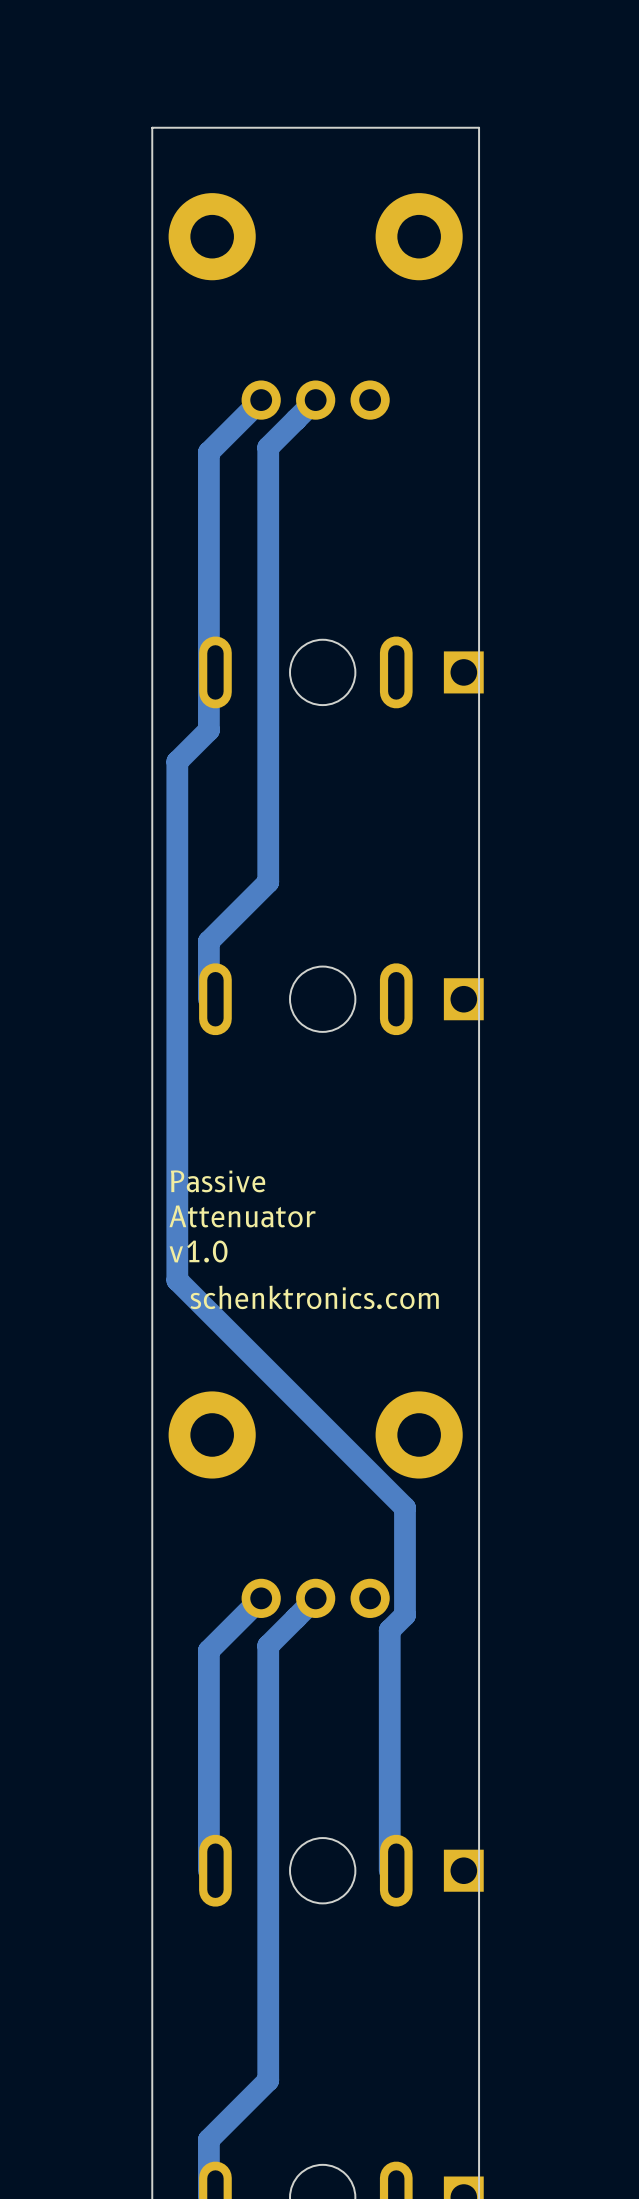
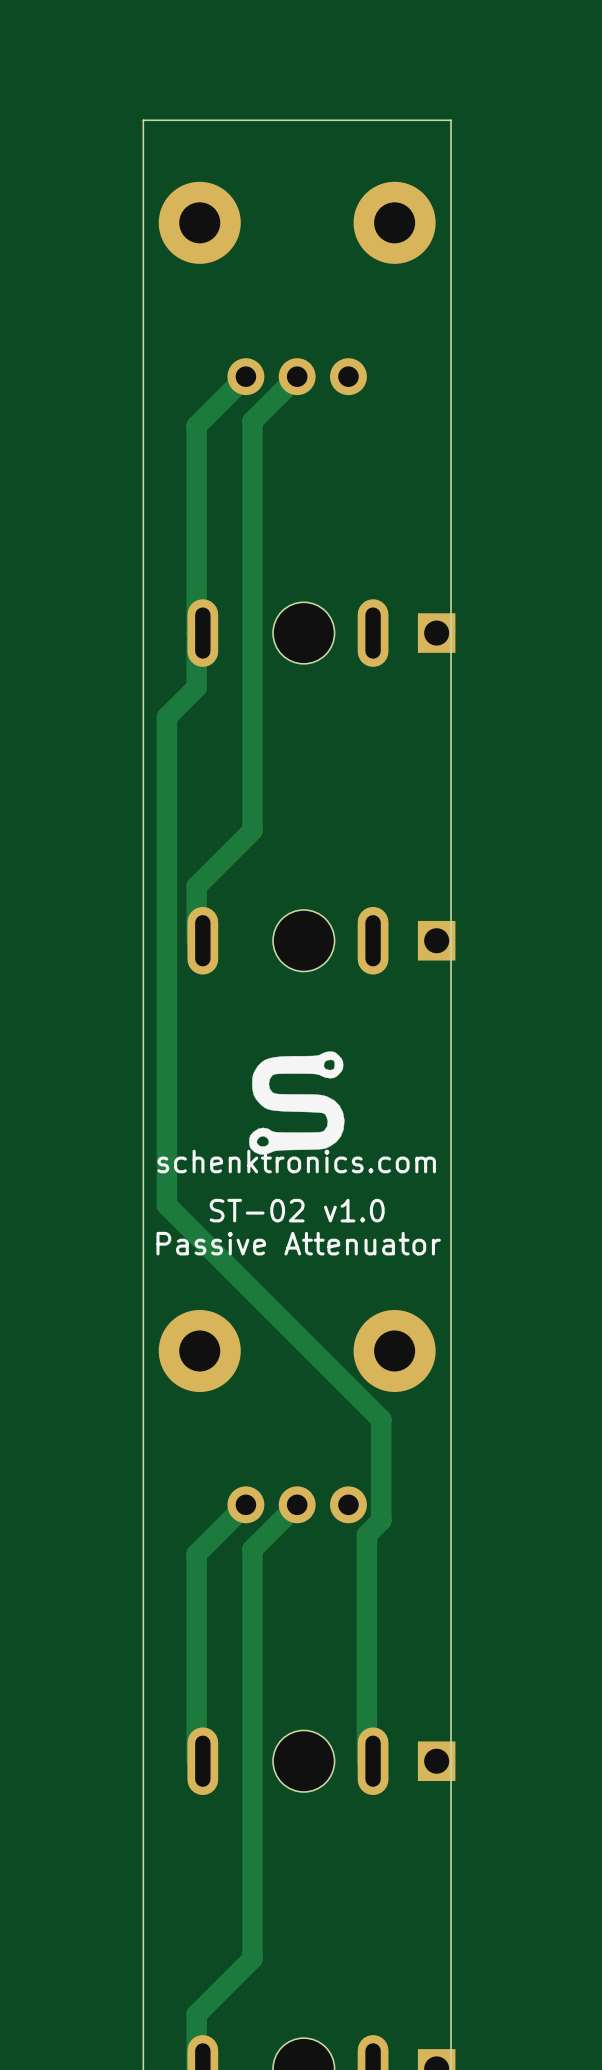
drawing: none -> [249, 1051, 345, 1155]
text: Passive (218, 1181) -> none
text: Attenuator (242, 1216) -> none
text: v1.0 (198, 1251) -> none
text: none -> ST-02 v1.0 (297, 1210)
text position: schenktronics.com (314, 1297) -> schenktronics.com (296, 1161)
text: none -> Passive Attenuator (298, 1243)

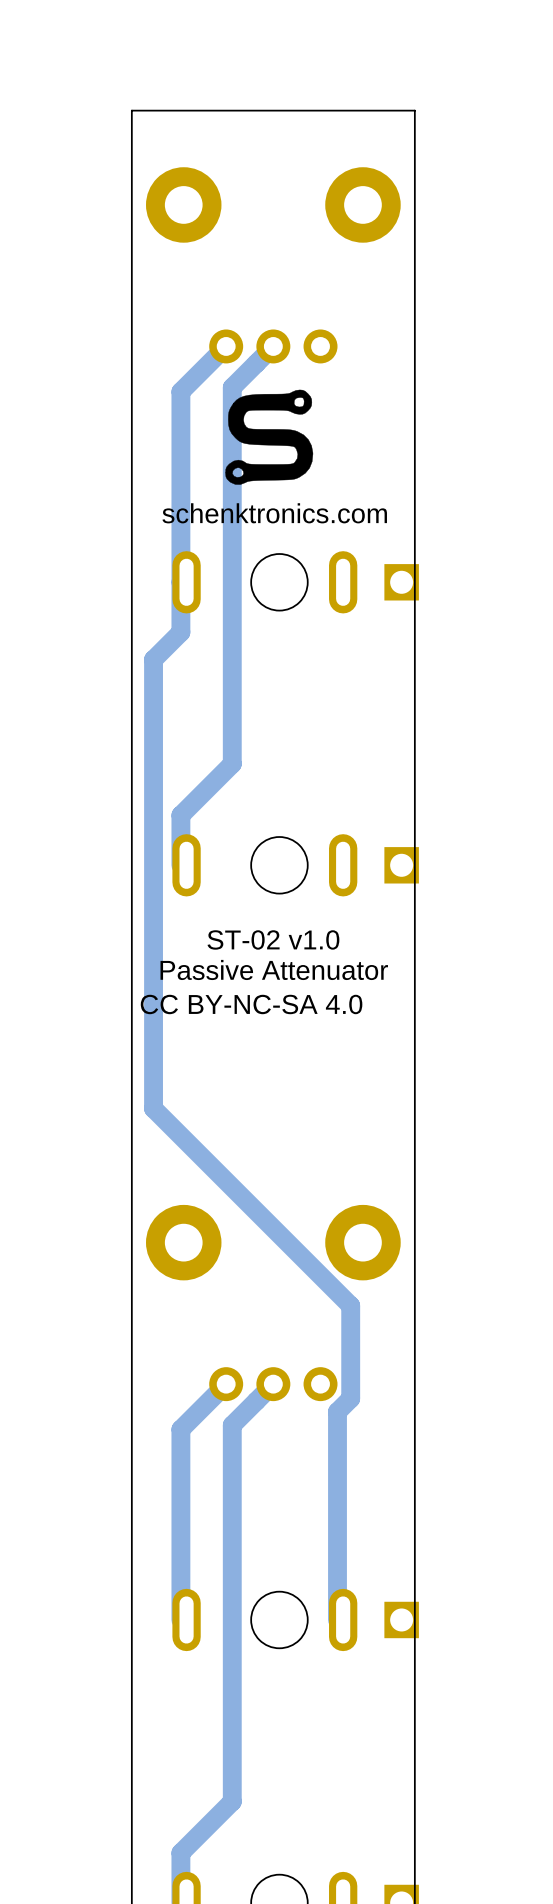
drawing: none -> [225, 389, 314, 485]
text: none -> schenktronics.com (274, 513)
drawing: [249, 1051, 345, 1155] -> none
text: none -> CC BY-NC-SA 4.0 (251, 1004)
text: schenktronics.com (296, 1161) -> none
text position: ST-02 v1.0 (297, 1210) -> ST-02 v1.0 (273, 939)
text position: Passive Attenuator (298, 1243) -> Passive Attenuator (274, 969)

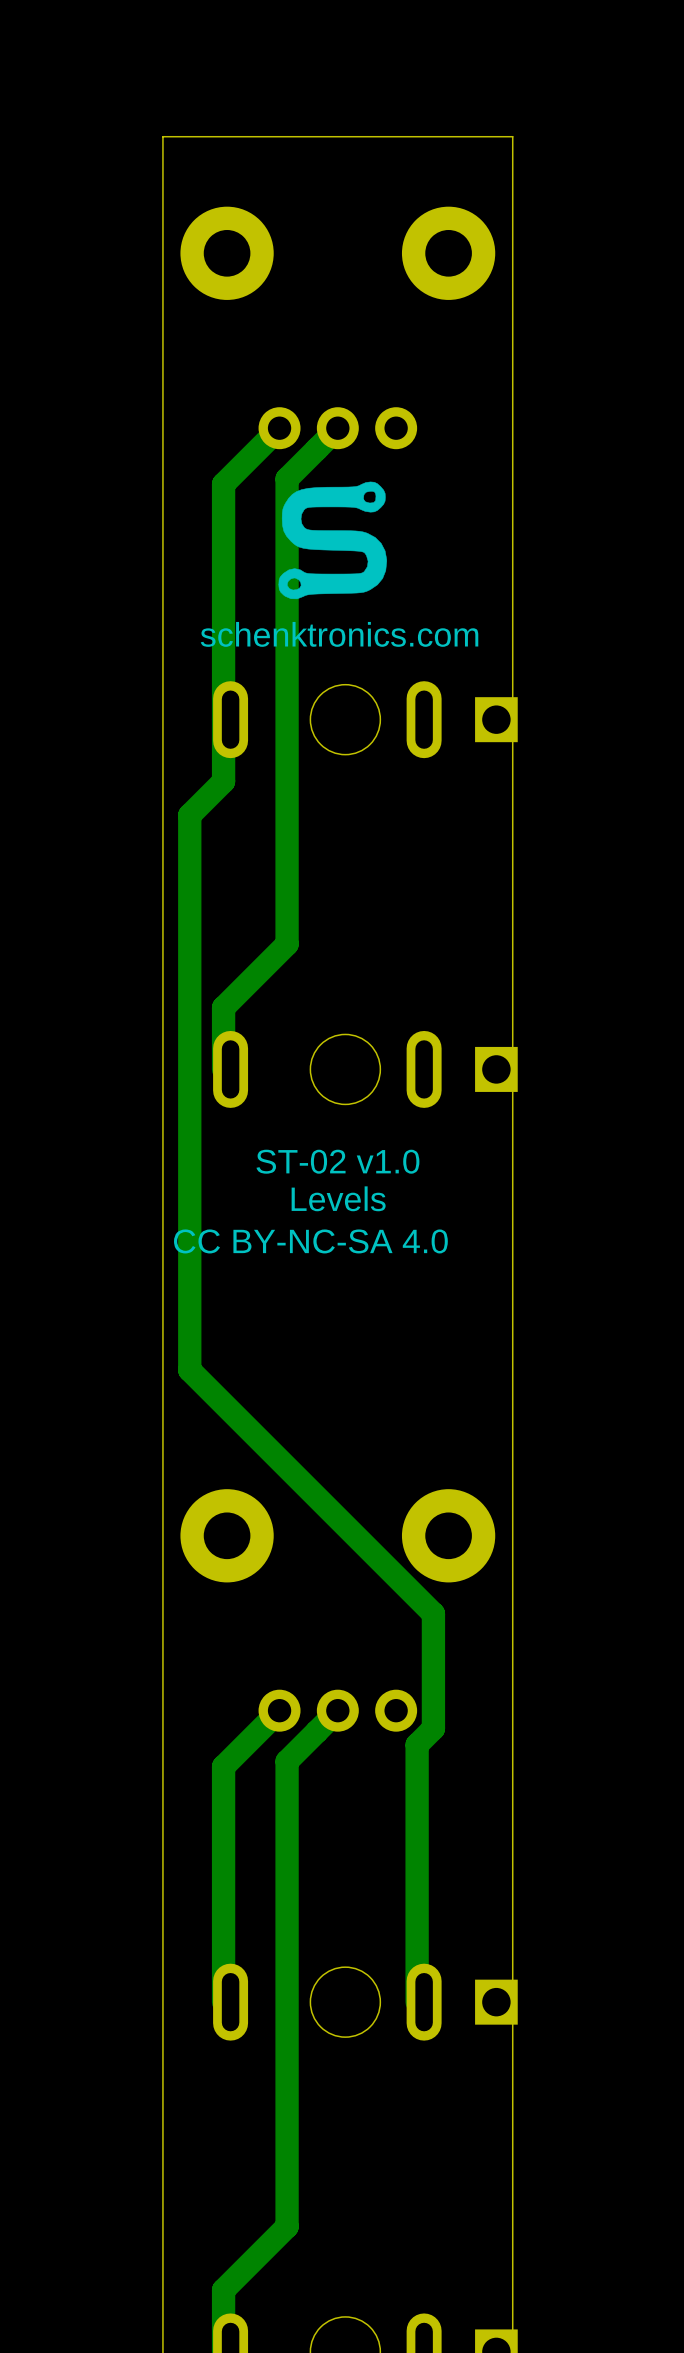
text: Passive Attenuator (274, 969) -> Levels (338, 1198)

